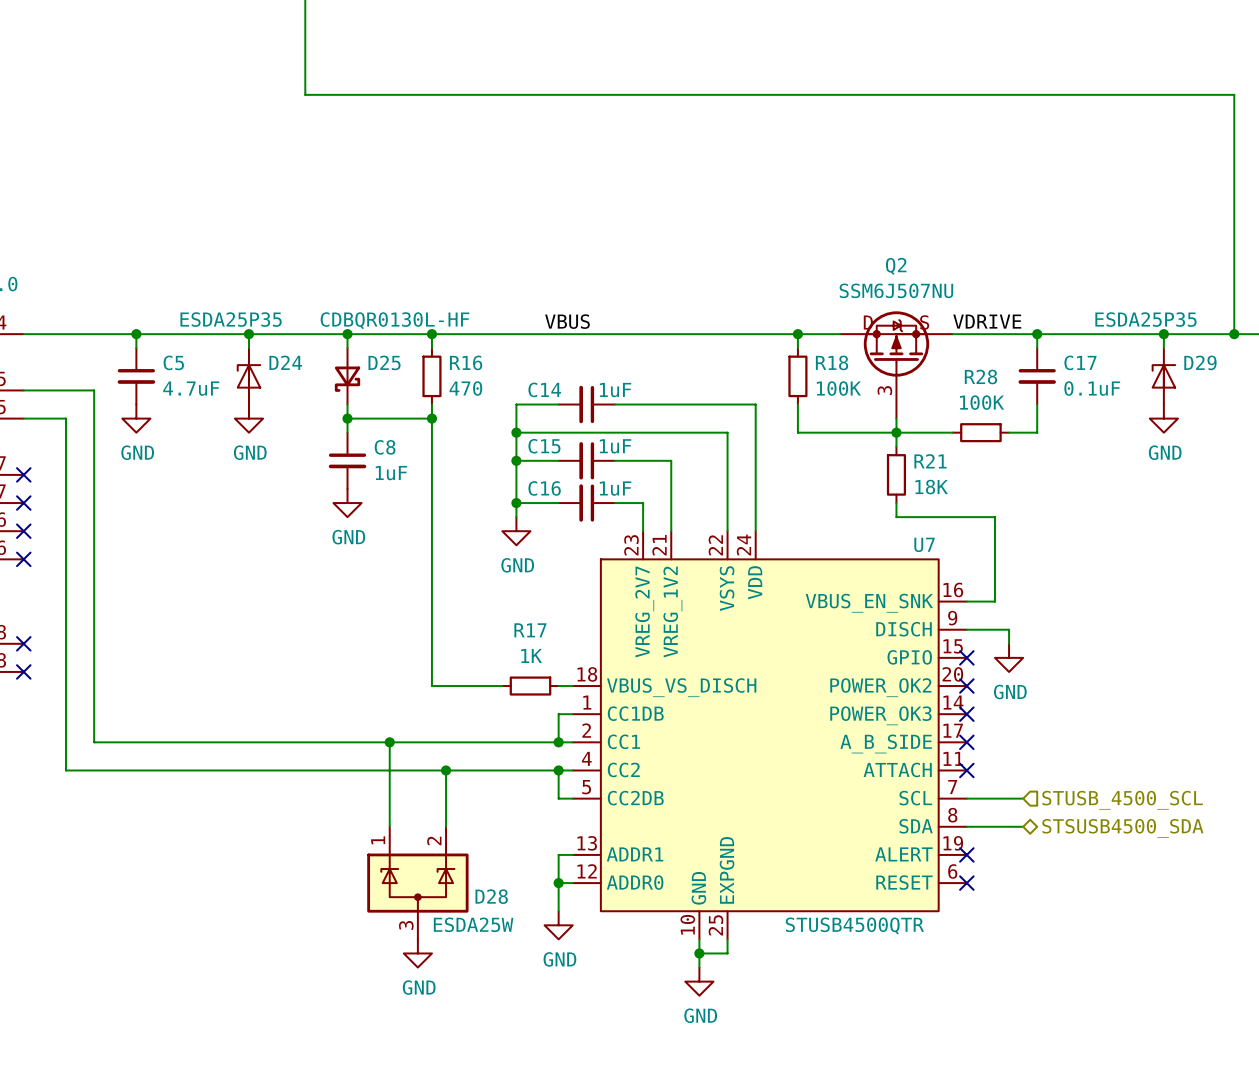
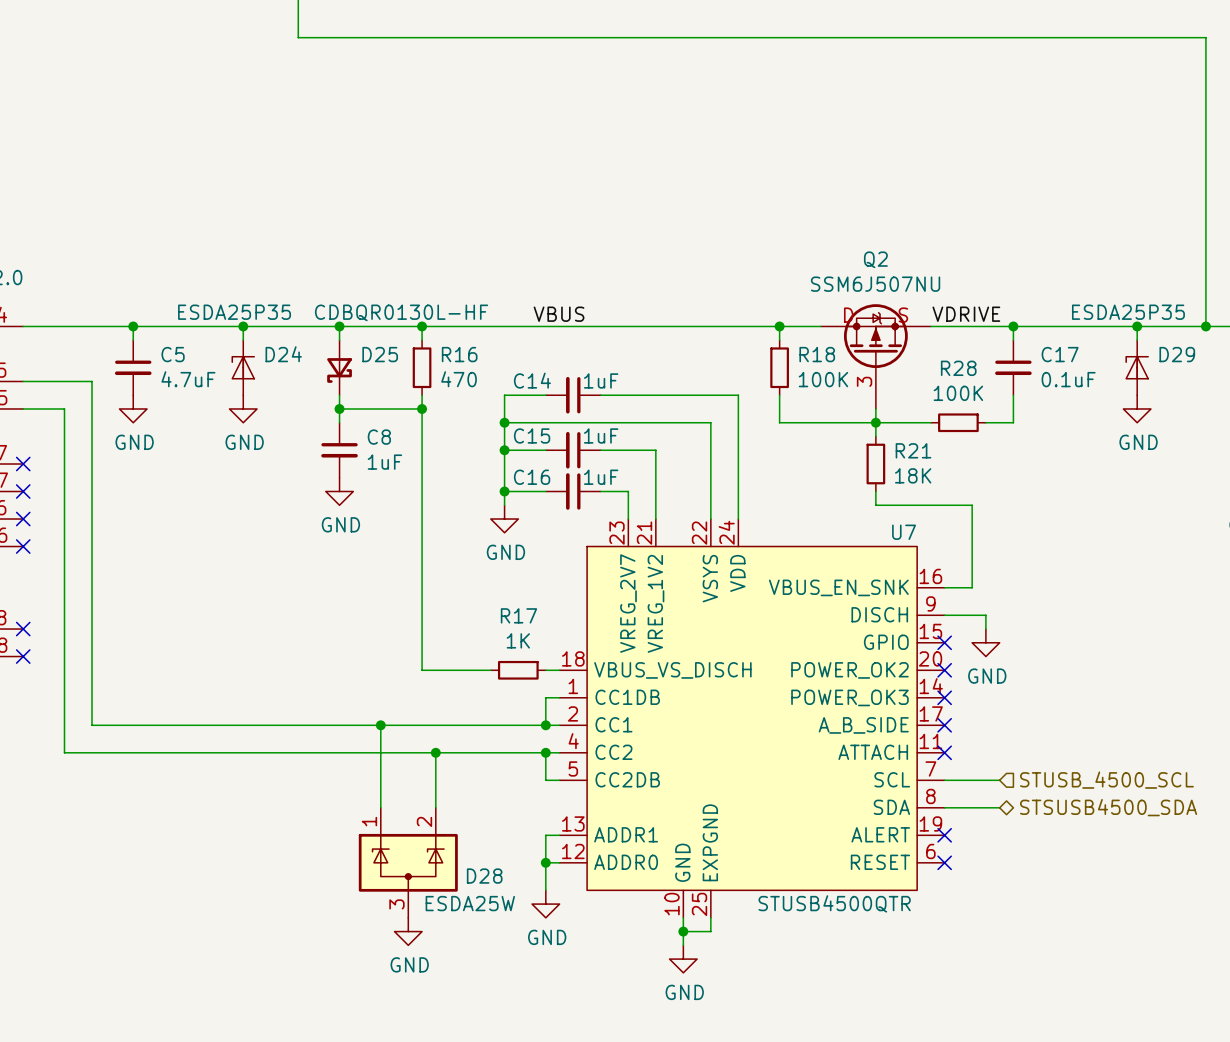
wire: (305, 38) (305, 94) (1234, 94) -> (298, 37) (1205, 37) (1205, 92)

